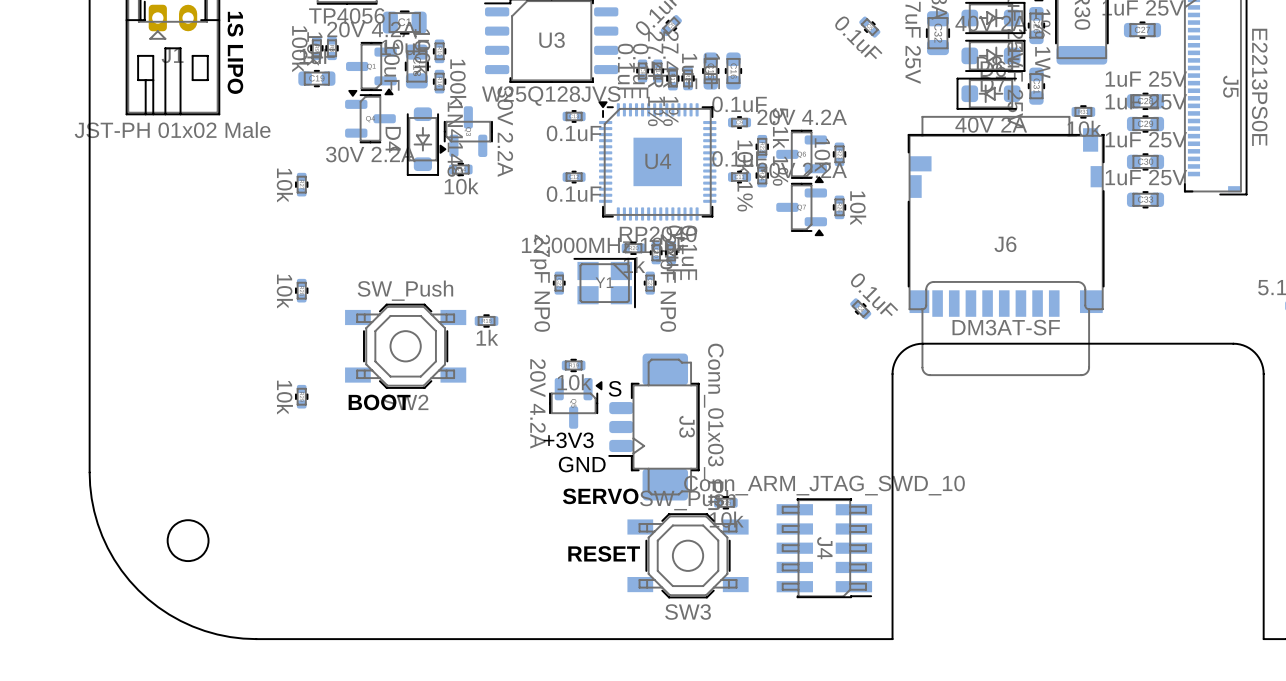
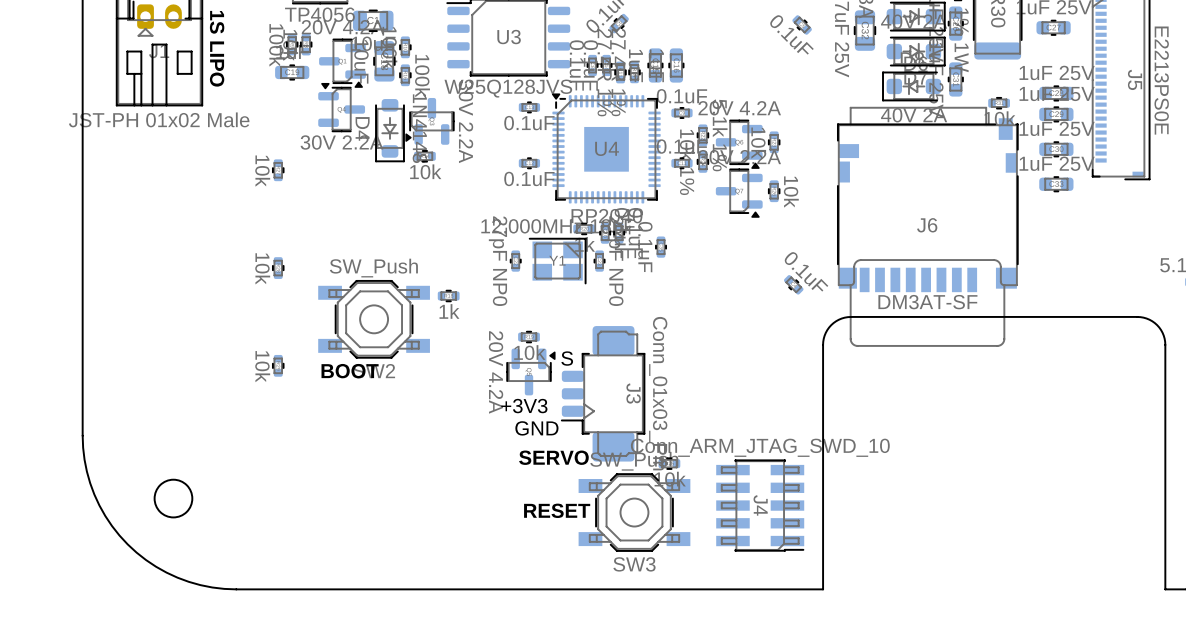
part: none -> 0.1uF (661, 247)

